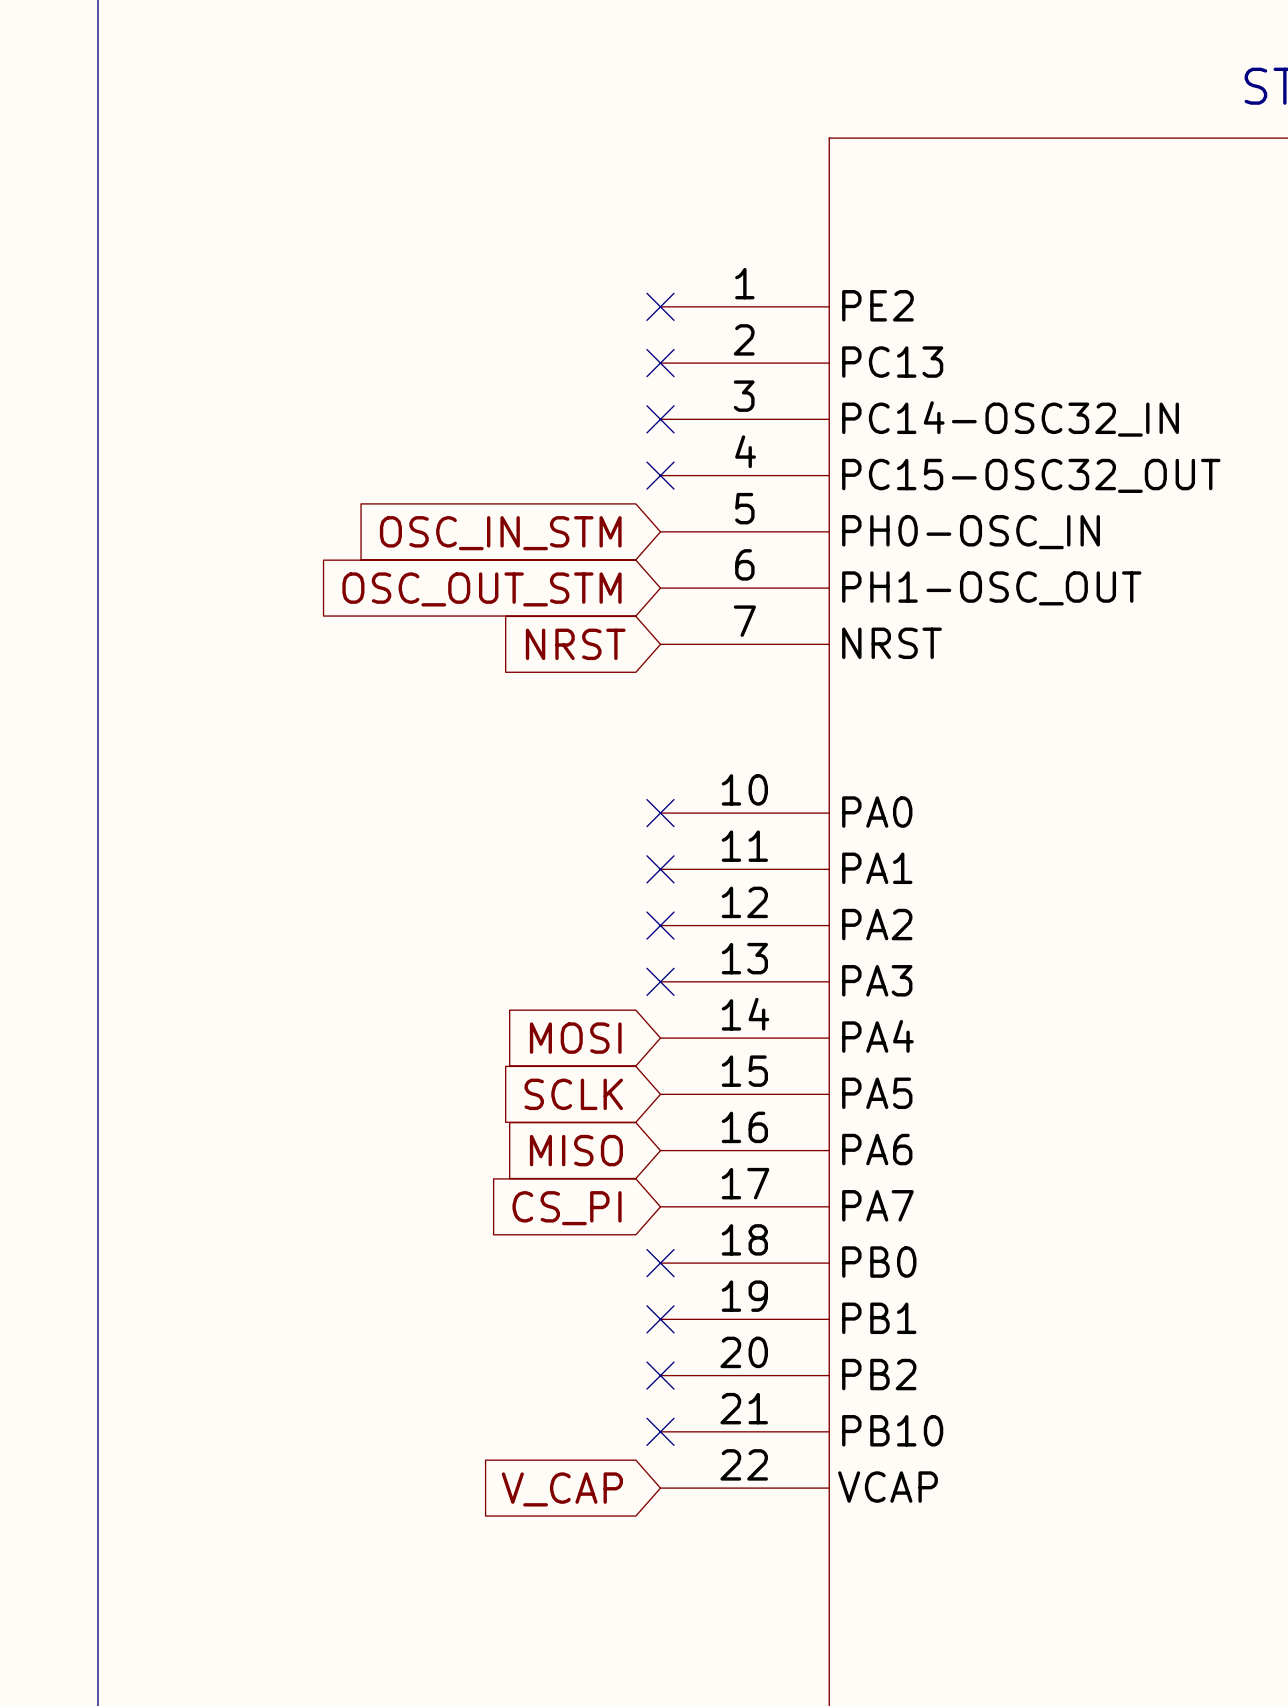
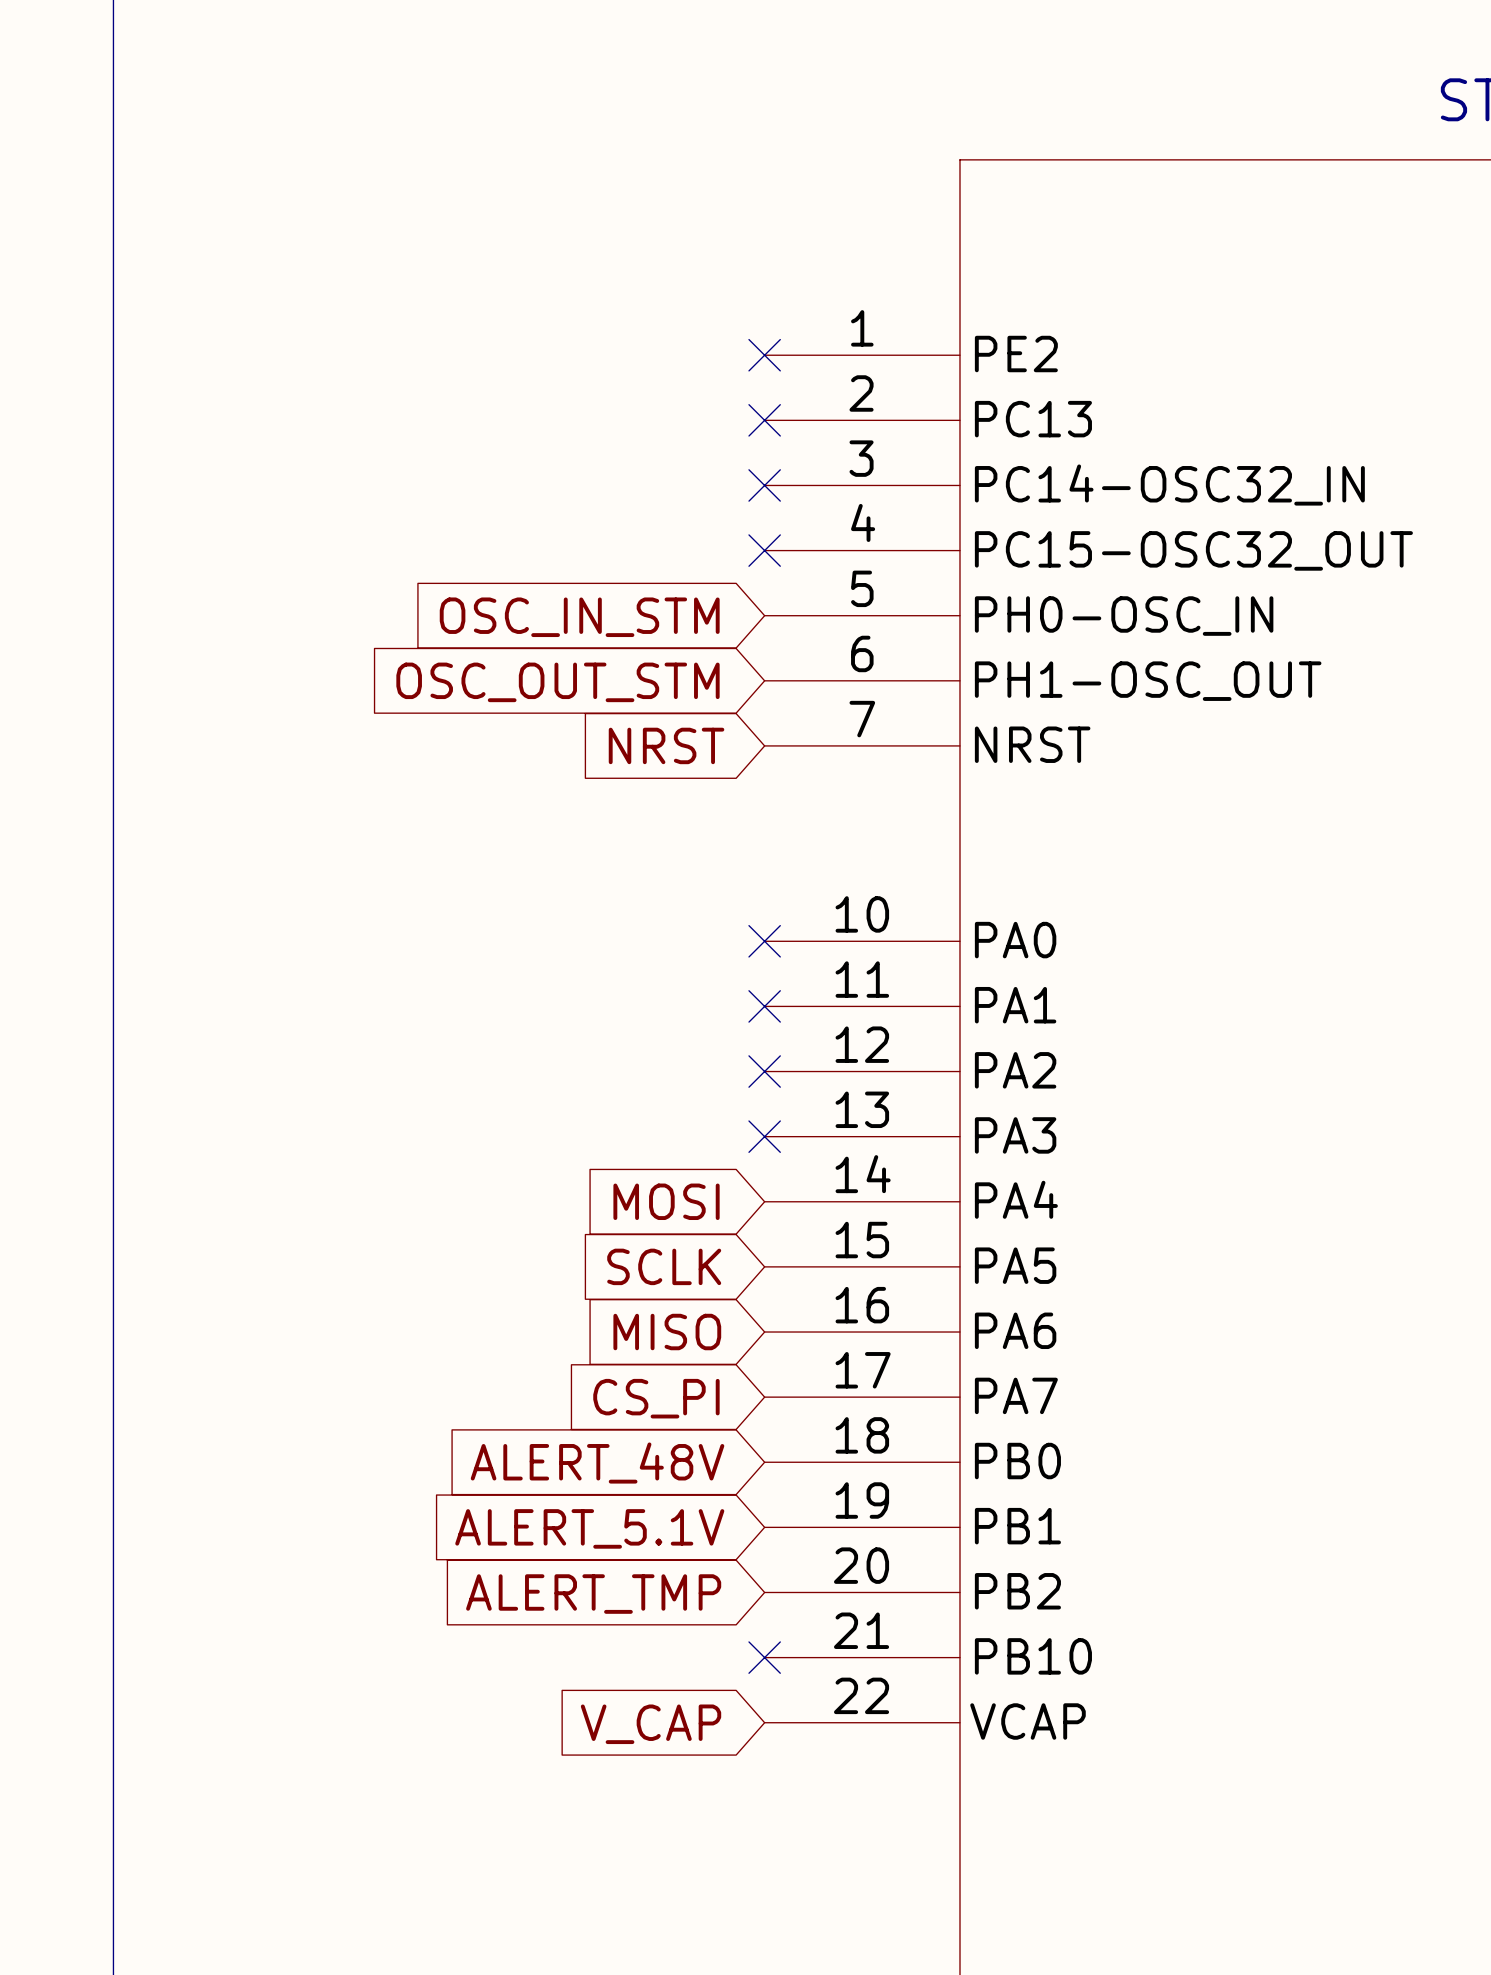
global label: none -> ALERT_48V (597, 1463)
no-connect mark: (660, 1263) -> none
no-connect mark: (660, 1319) -> none
global label: none -> ALERT_5.1V (589, 1528)
no-connect mark: (660, 1375) -> none
global label: none -> ALERT_TMP (593, 1594)

